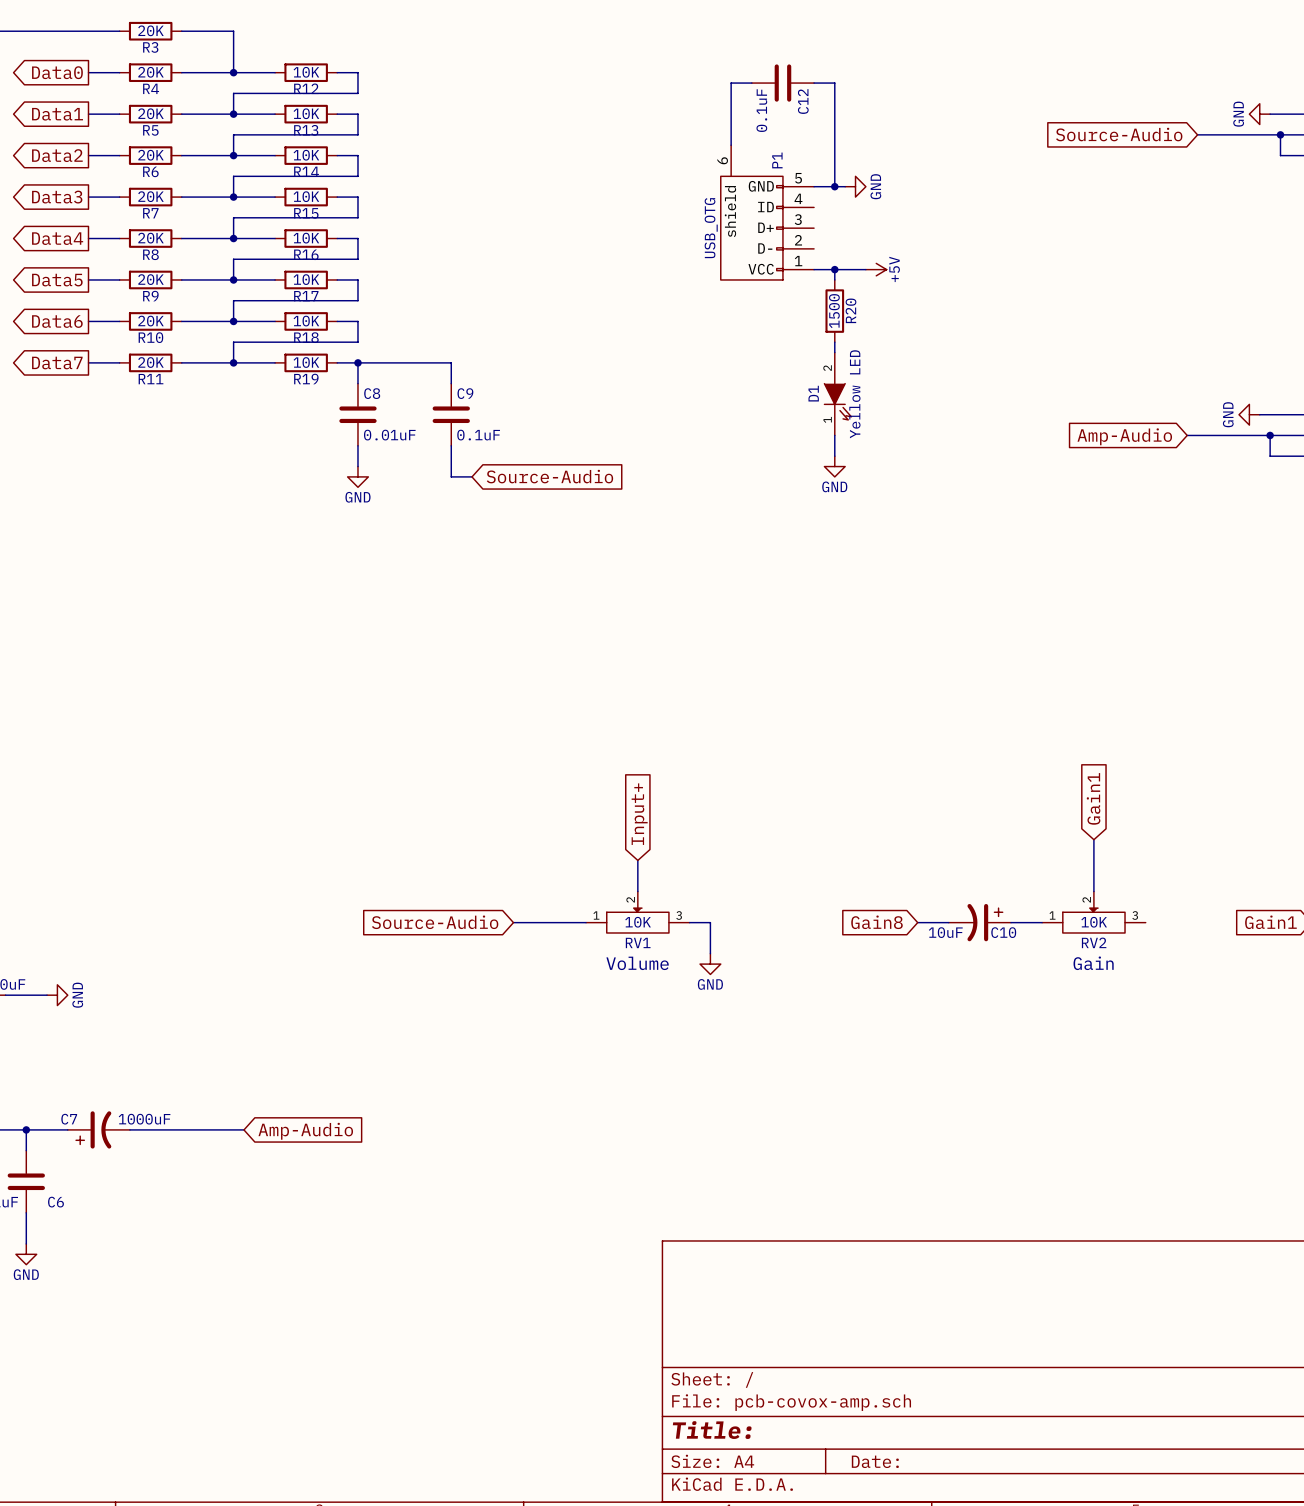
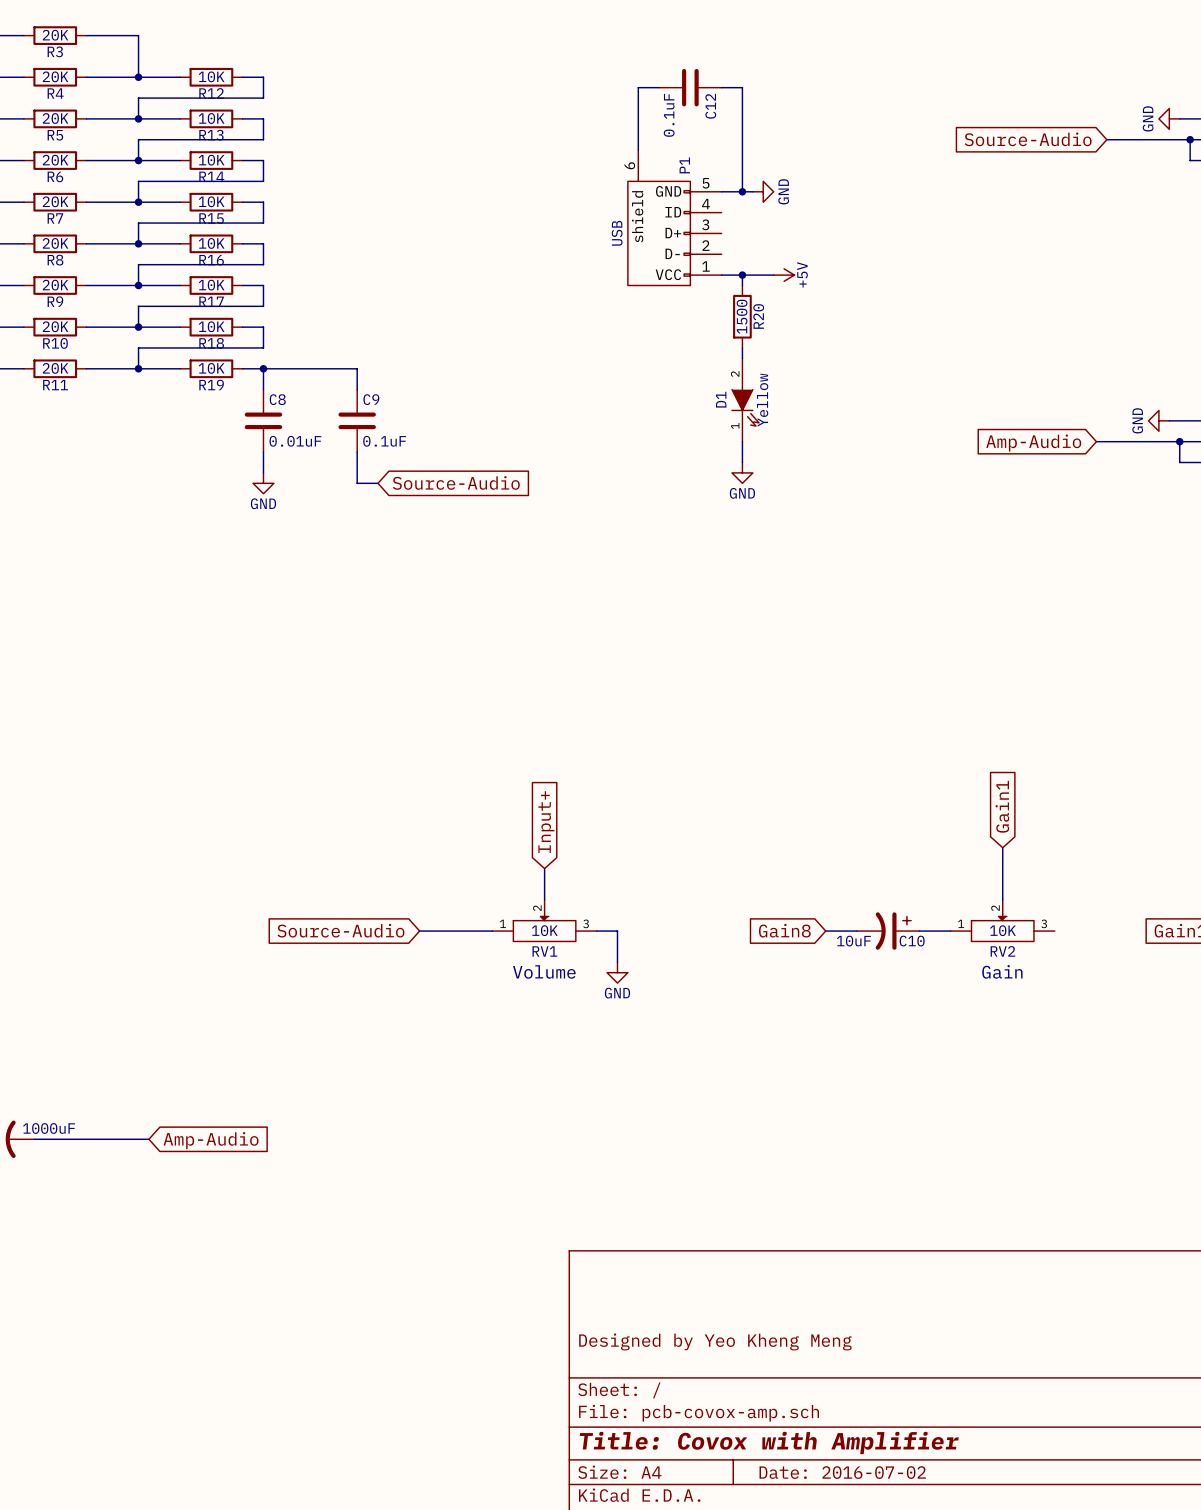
P1 value: USB_OTG (711, 228) -> USB (617, 233)
D1 value: Yellow LED (854, 394) -> Yellow (762, 400)
title block: none -> Designed by Yeo Kheng Meng (715, 1341)
title block: Title: (712, 1430) -> Title: Covox with Amplifier (769, 1442)
title block: Date: (875, 1461) -> Date: 2016-07-02 (842, 1472)

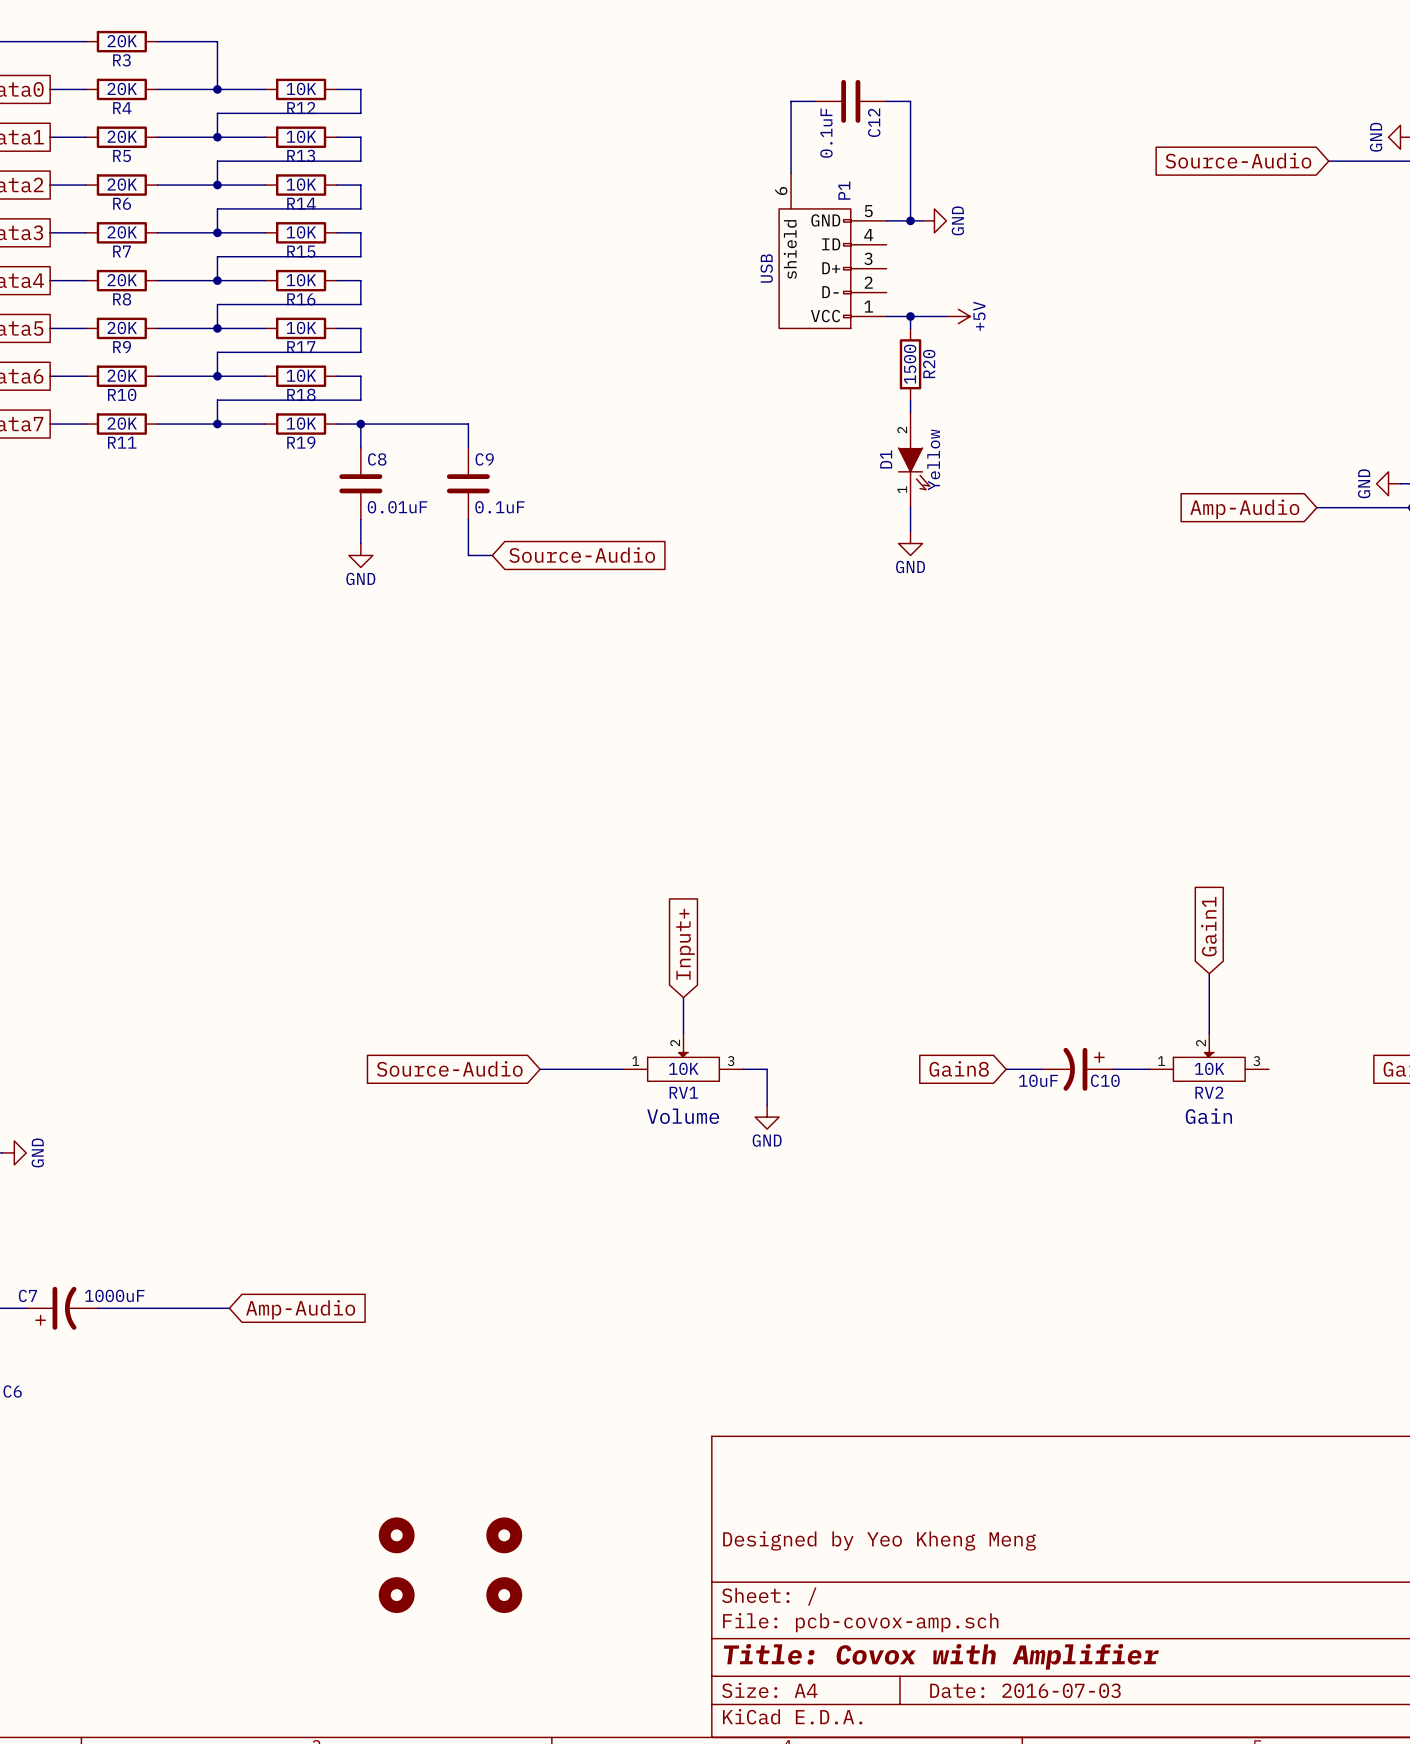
part: none -> (396, 1535)
part: none -> (504, 1535)
part: none -> (396, 1595)
part: none -> (504, 1595)
title block: Date: 2016-07-02 (842, 1472) -> Date: 2016-07-03 (1025, 1690)

